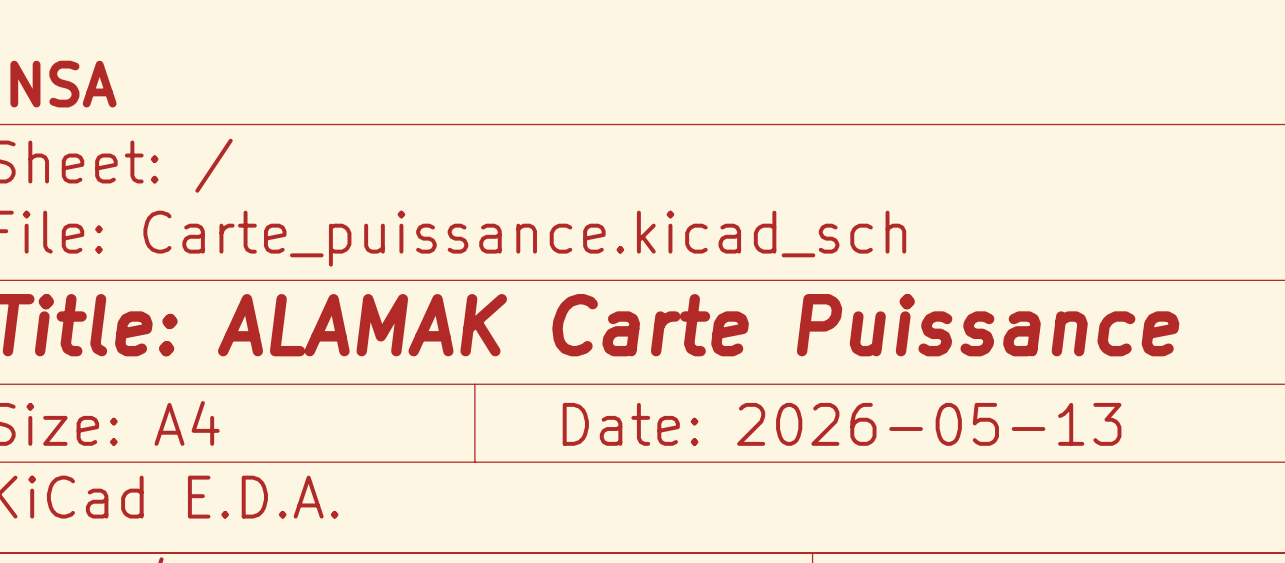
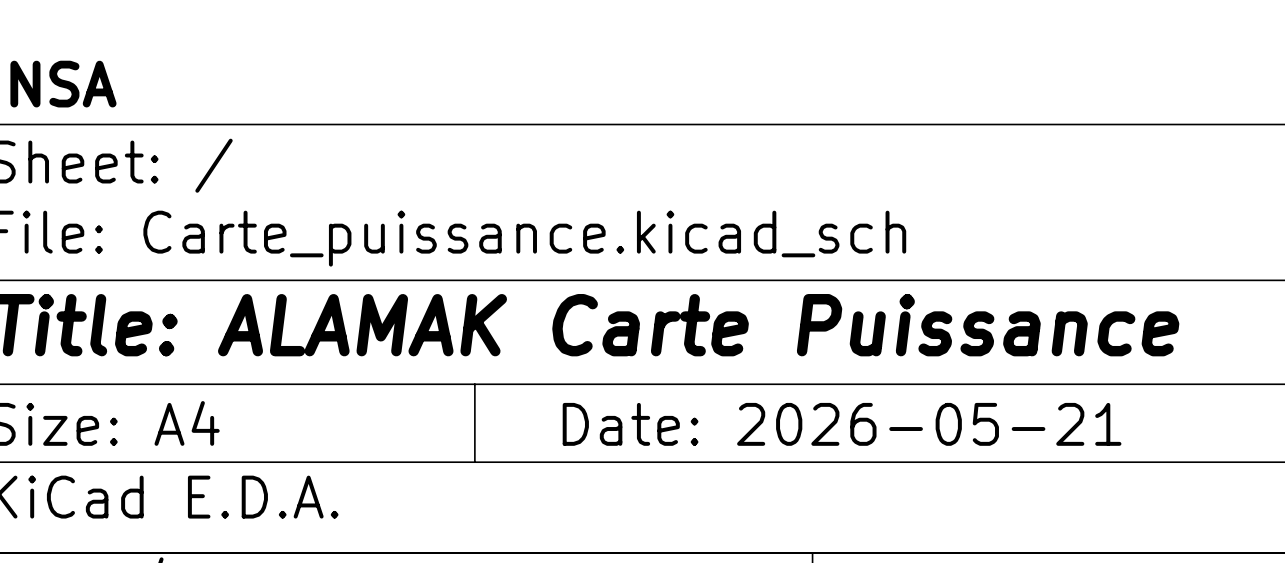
title block: Date: 2026-05-13 (842, 424) -> Date: 2026-05-21 (842, 424)

